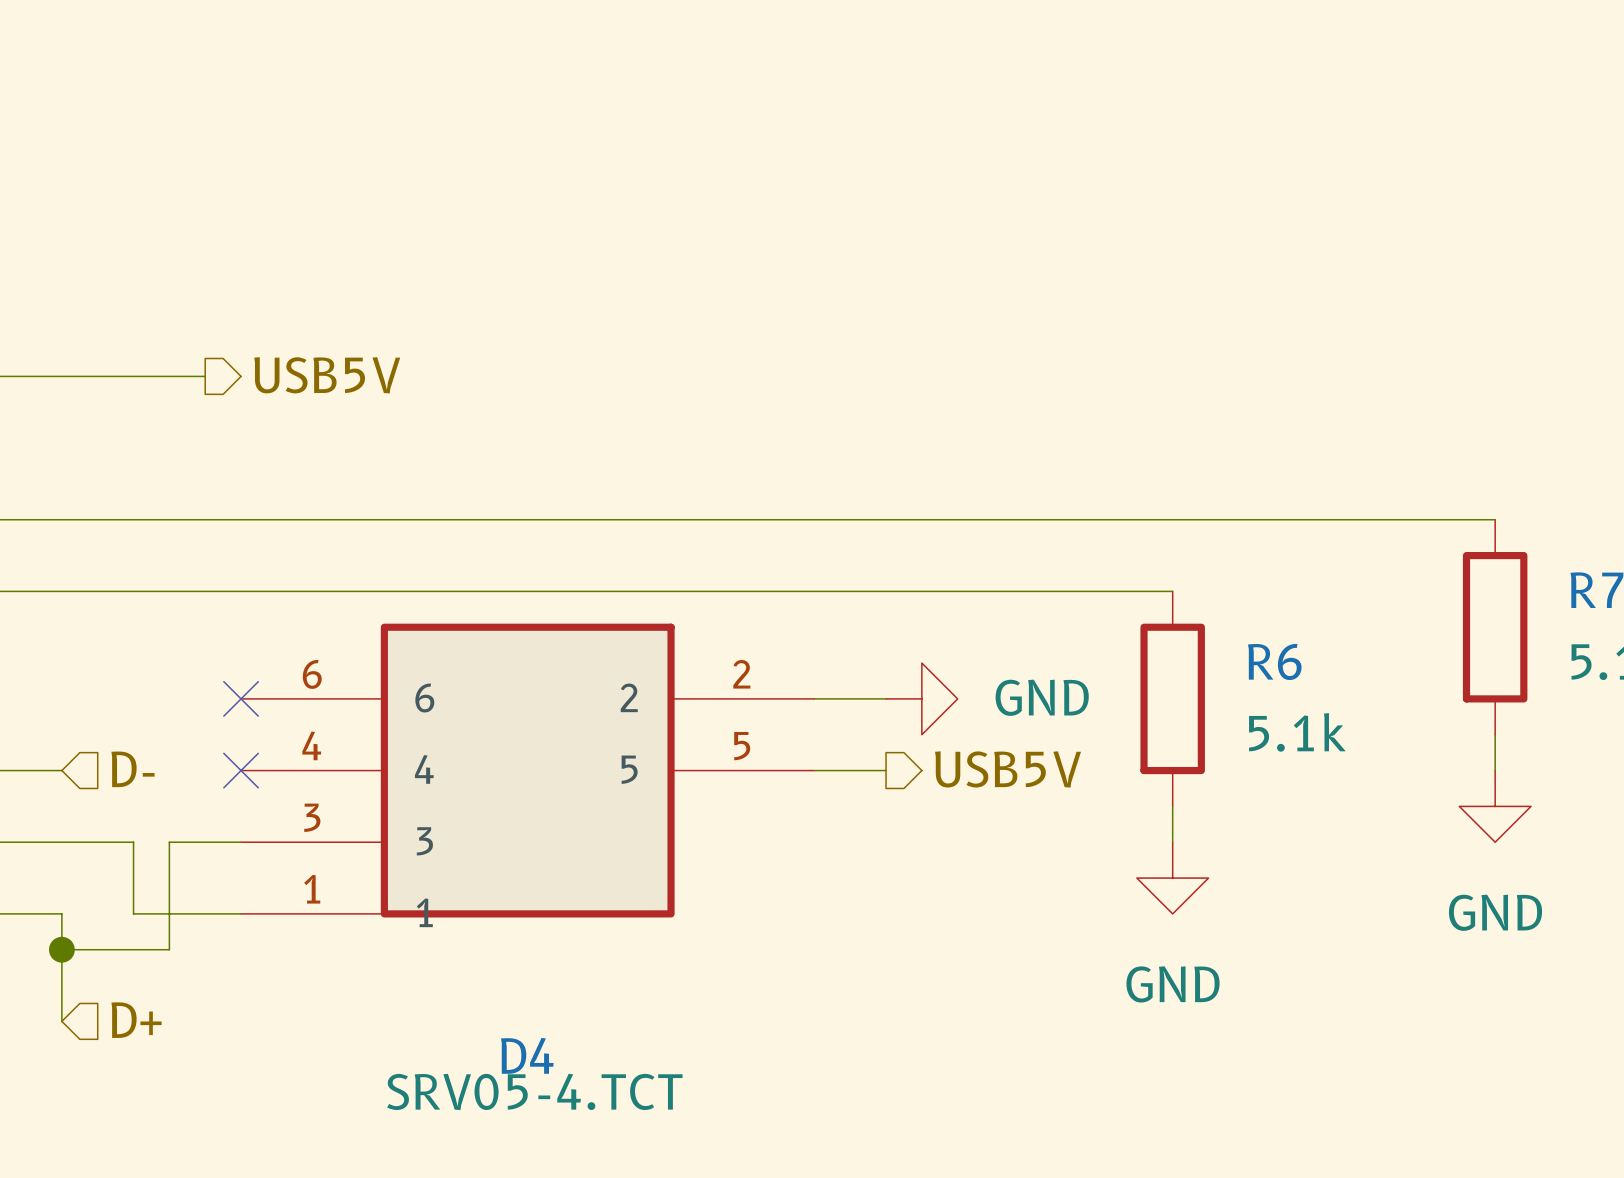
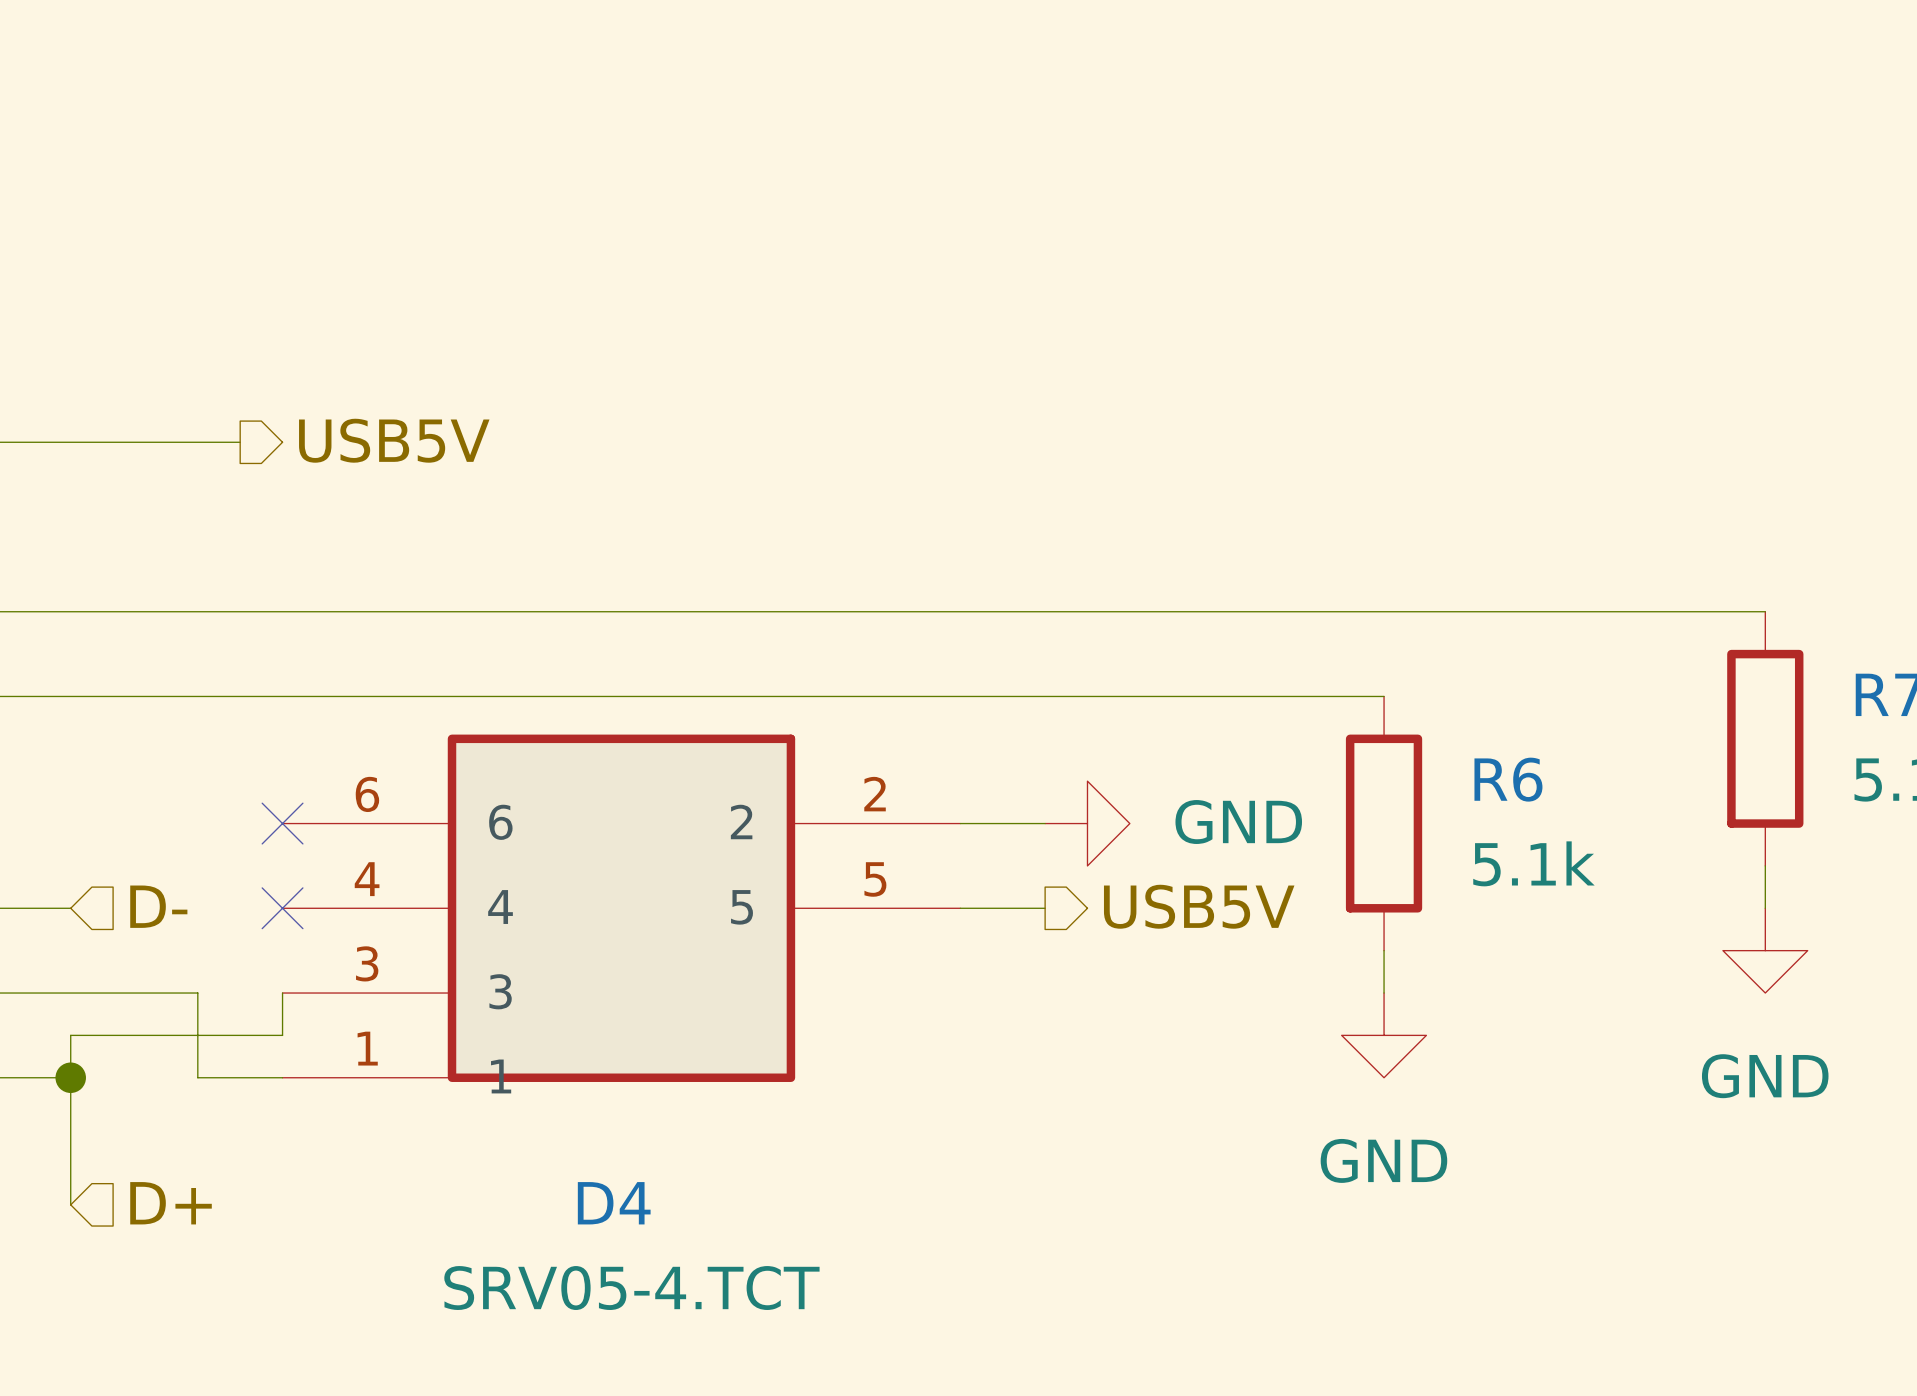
wire: (133, 842) (133, 913) (169, 913) (169, 949) (61, 949) -> none
wire: (169, 842) (241, 842) -> (197, 993) (155, 993)
wire: none -> (282, 993) (282, 1035) (70, 1035) (70, 1077)
junction position: (61, 949) -> (70, 1077)
D4 name position: D4 (527, 1055) -> D4 (614, 1203)

